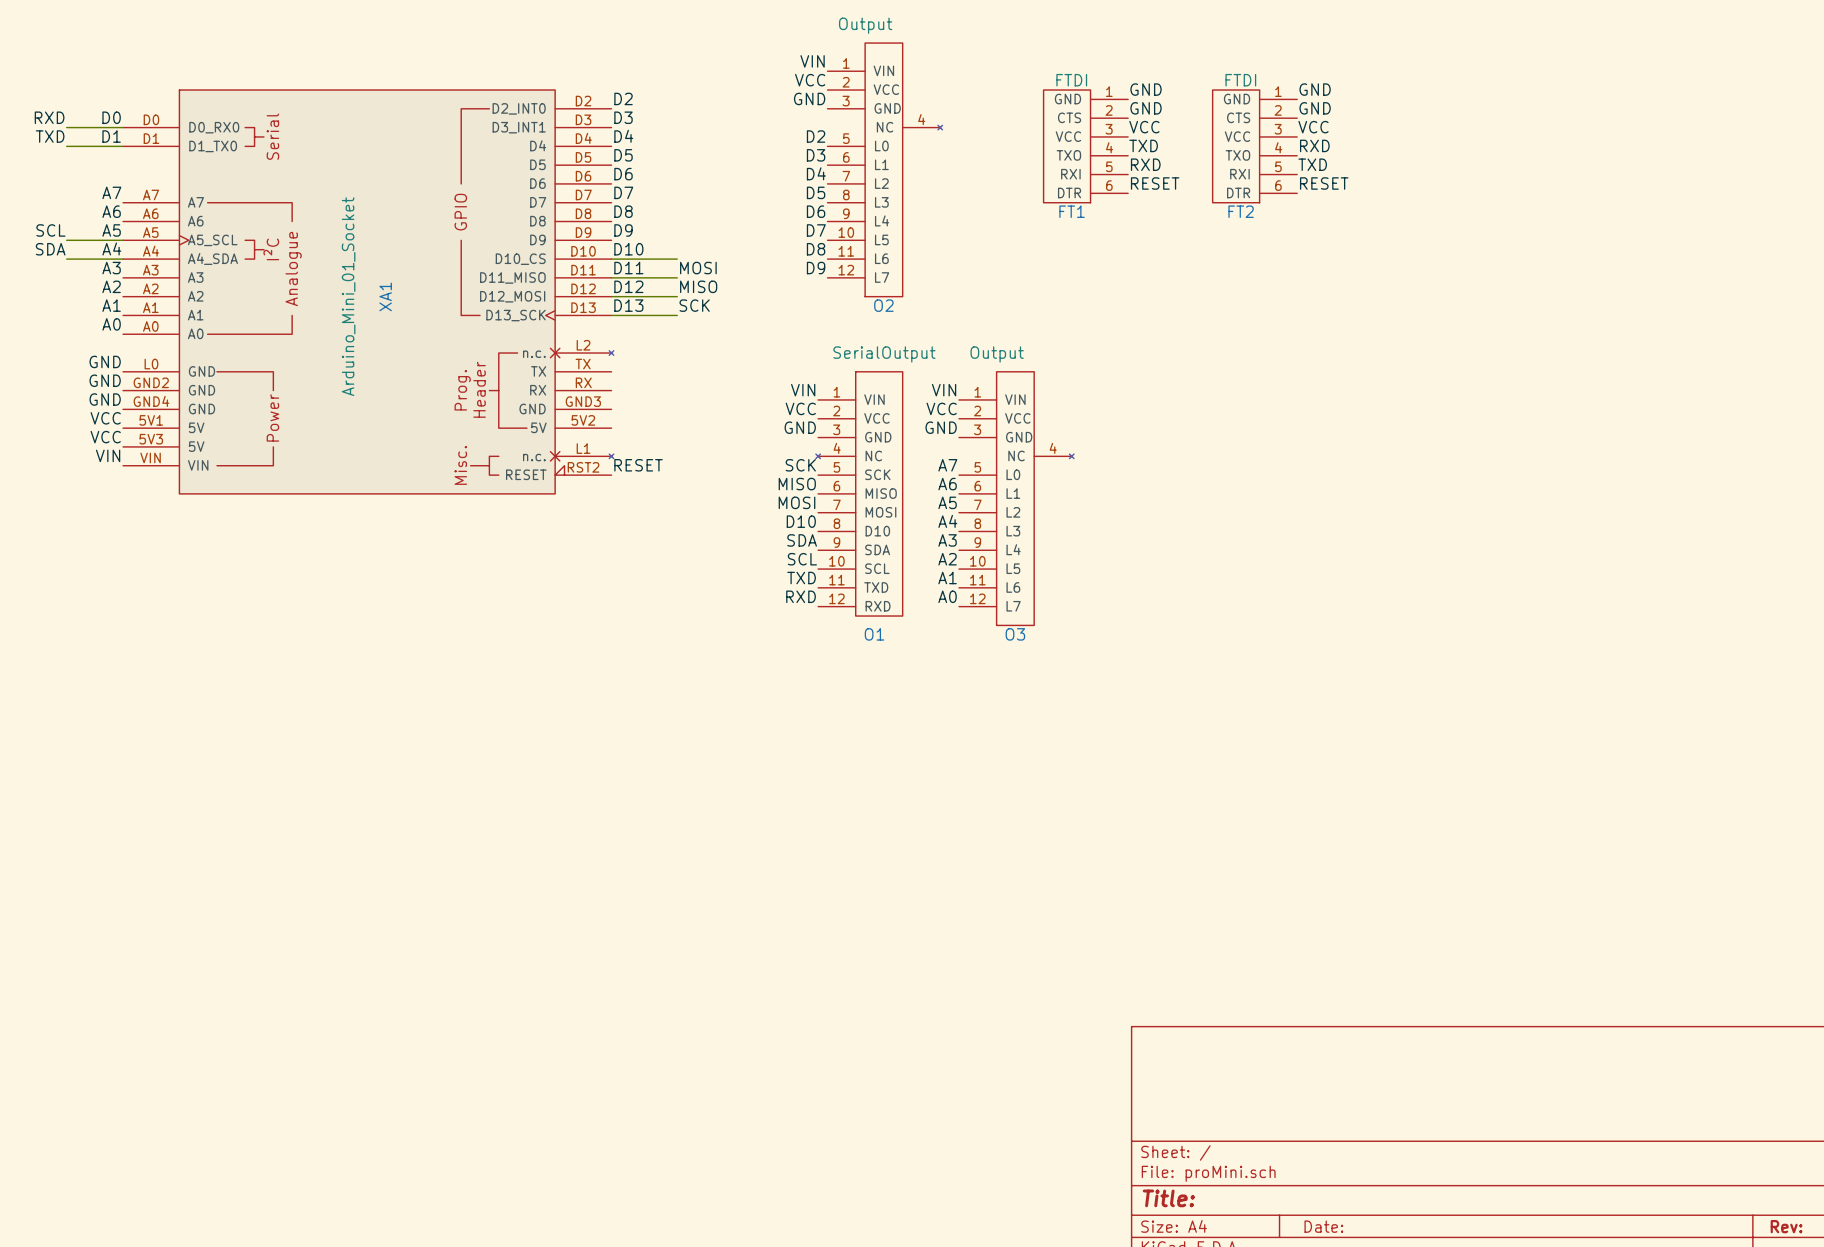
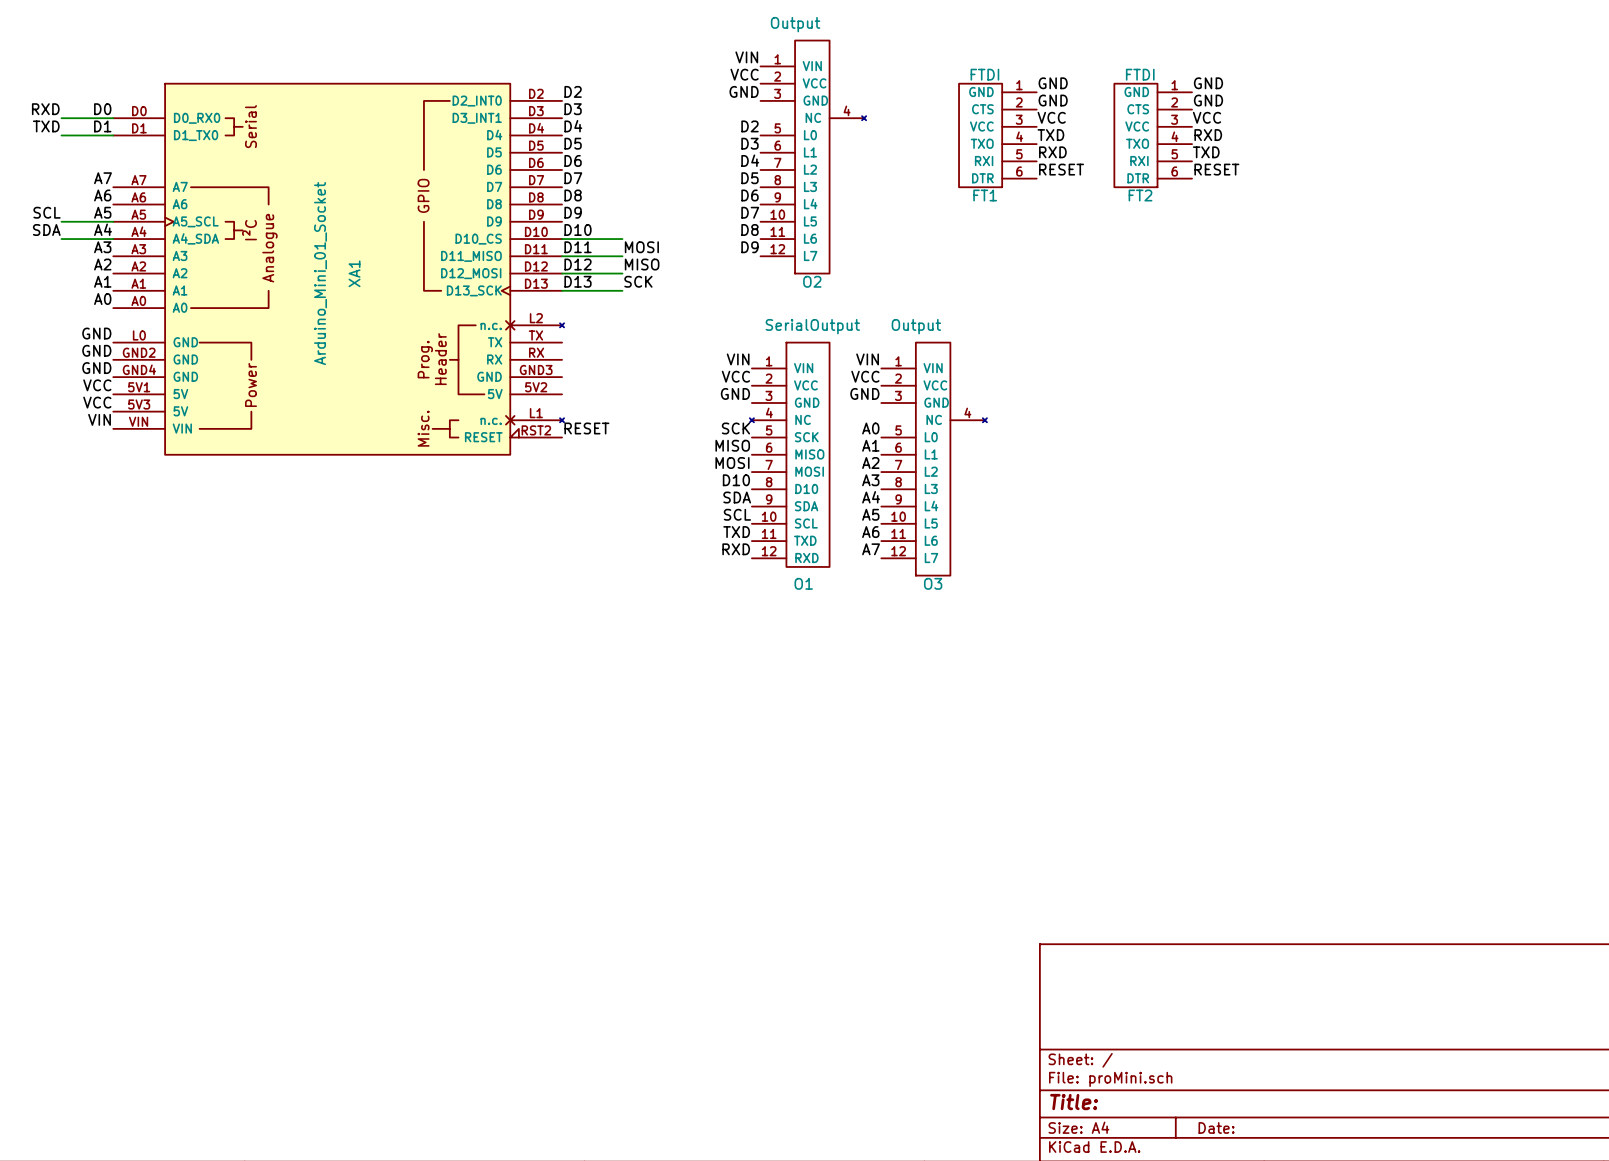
label: A7 (947, 465) -> A0 (870, 428)
label: A6 (947, 484) -> A1 (870, 445)
label: A5 (947, 502) -> A2 (870, 463)
label: A4 (947, 521) -> A3 (870, 480)
label: A3 (947, 540) -> A4 (871, 497)
label: A2 (947, 559) -> A5 (870, 514)
label: A1 (947, 578) -> A6 (870, 532)
label: A0 (947, 596) -> A7 (871, 549)

